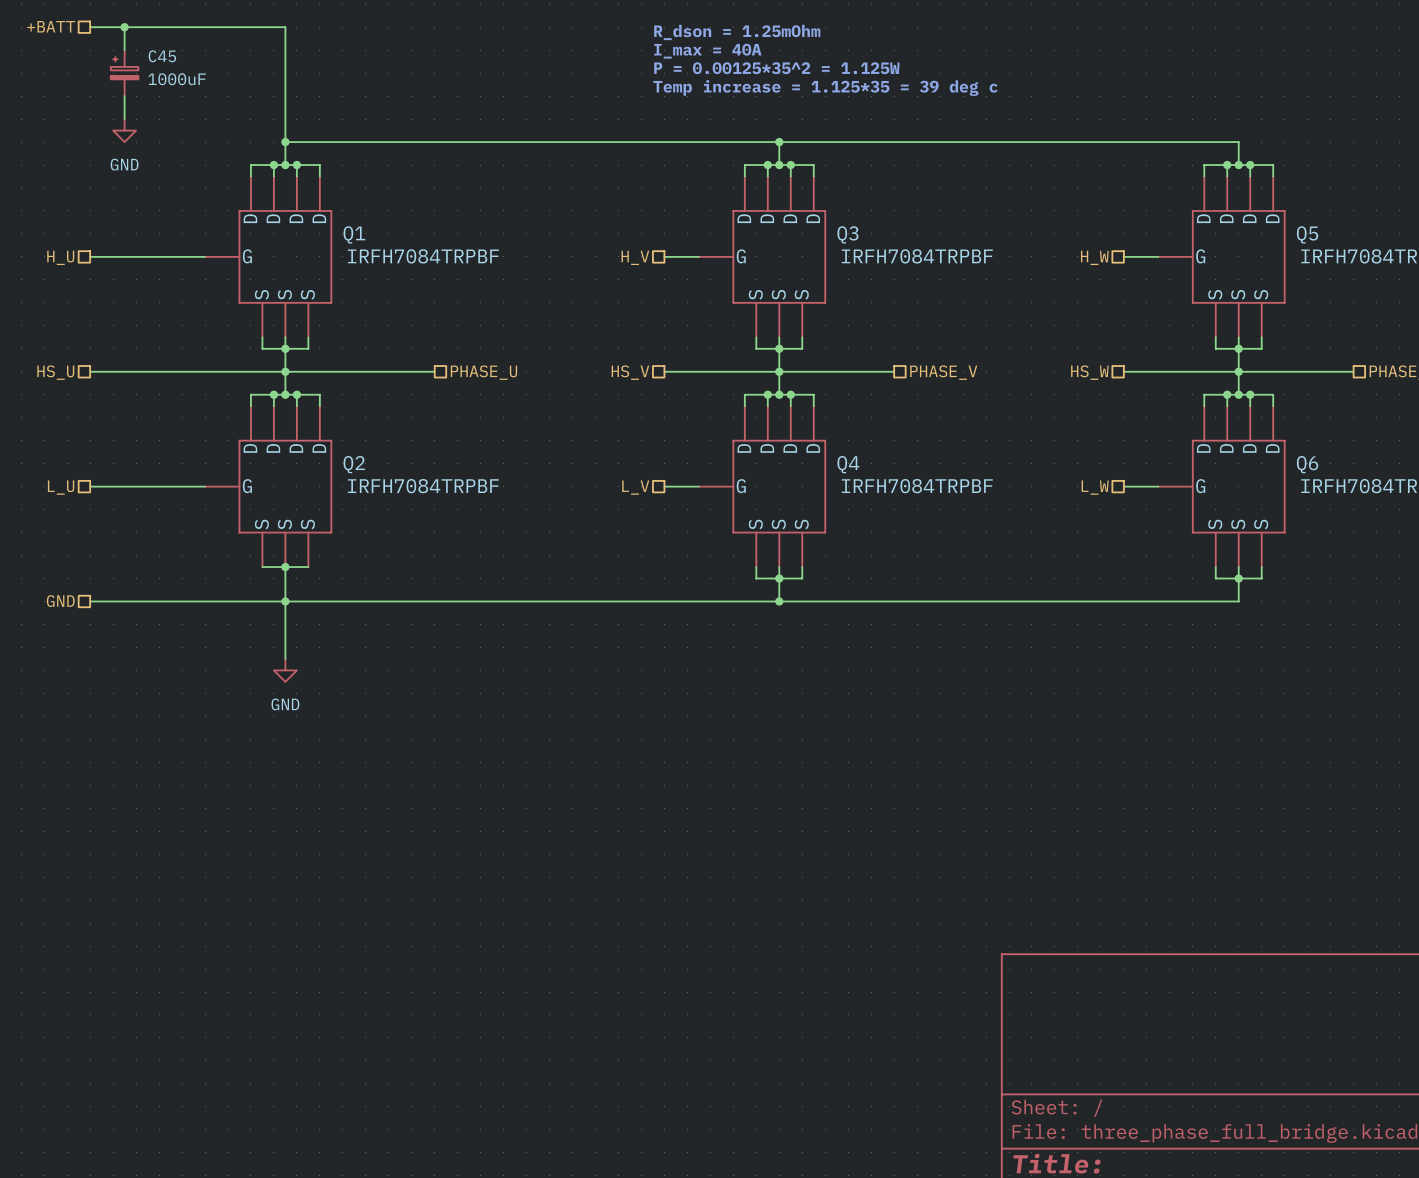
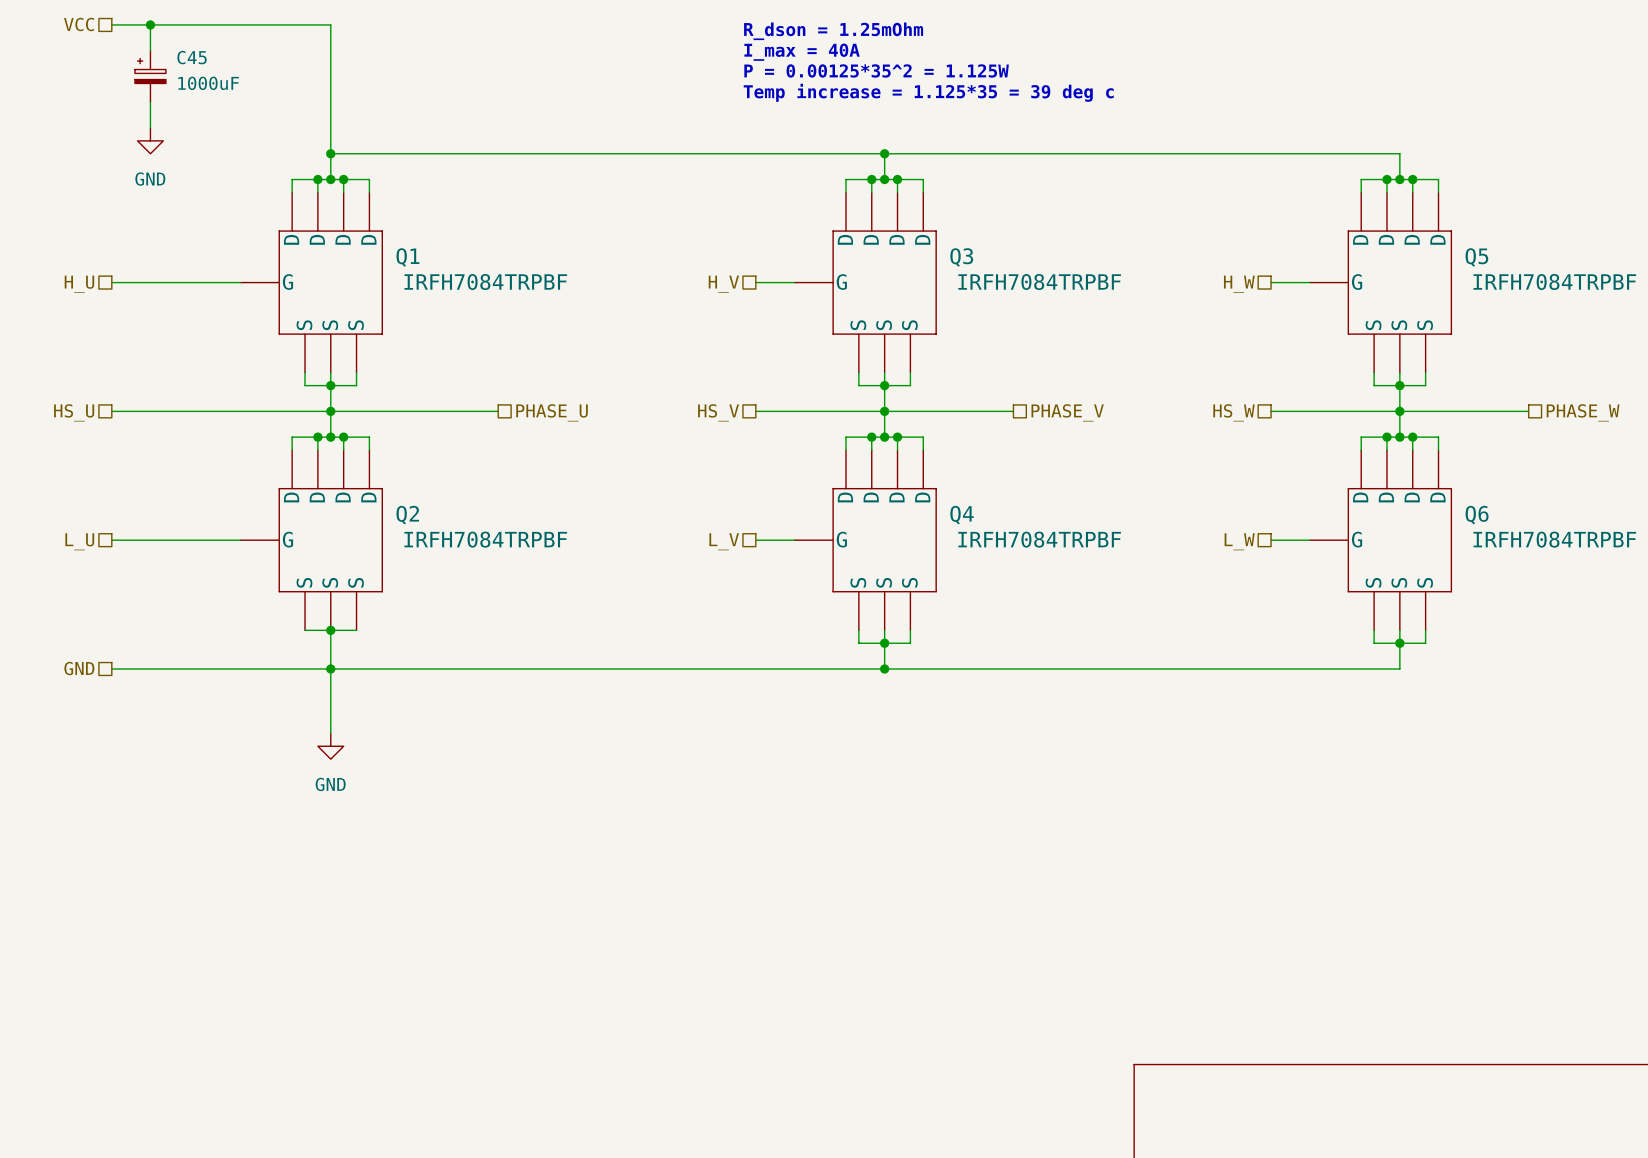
hierarchical label: +BATT (51, 26) -> VCC (79, 24)

